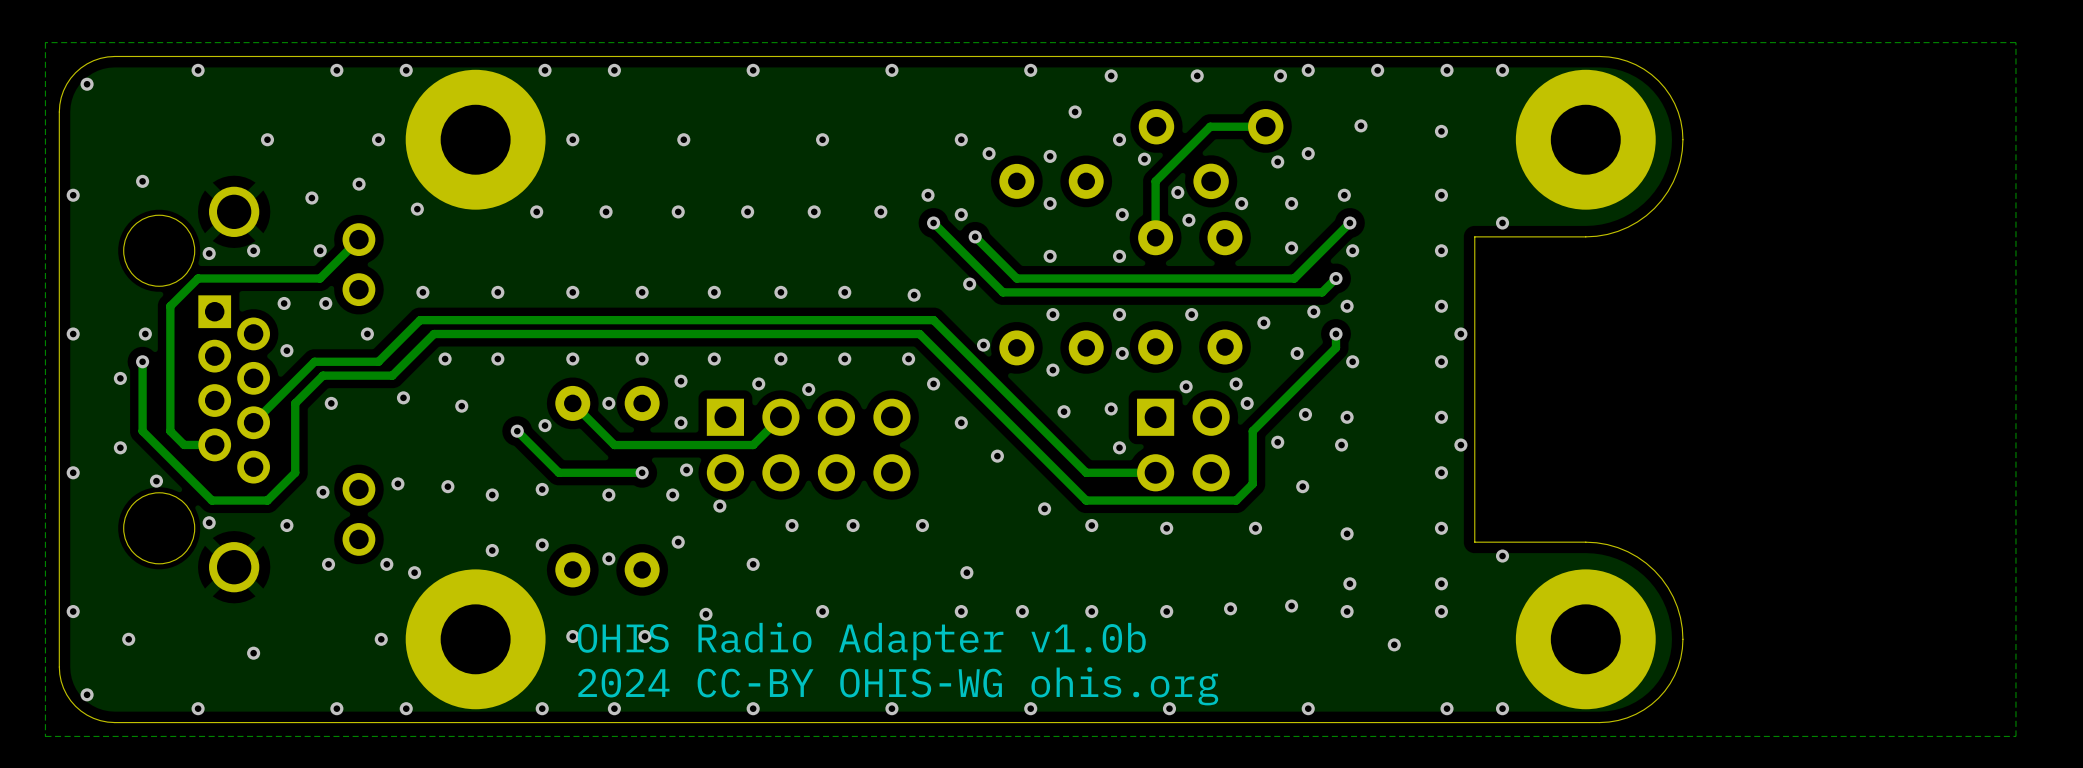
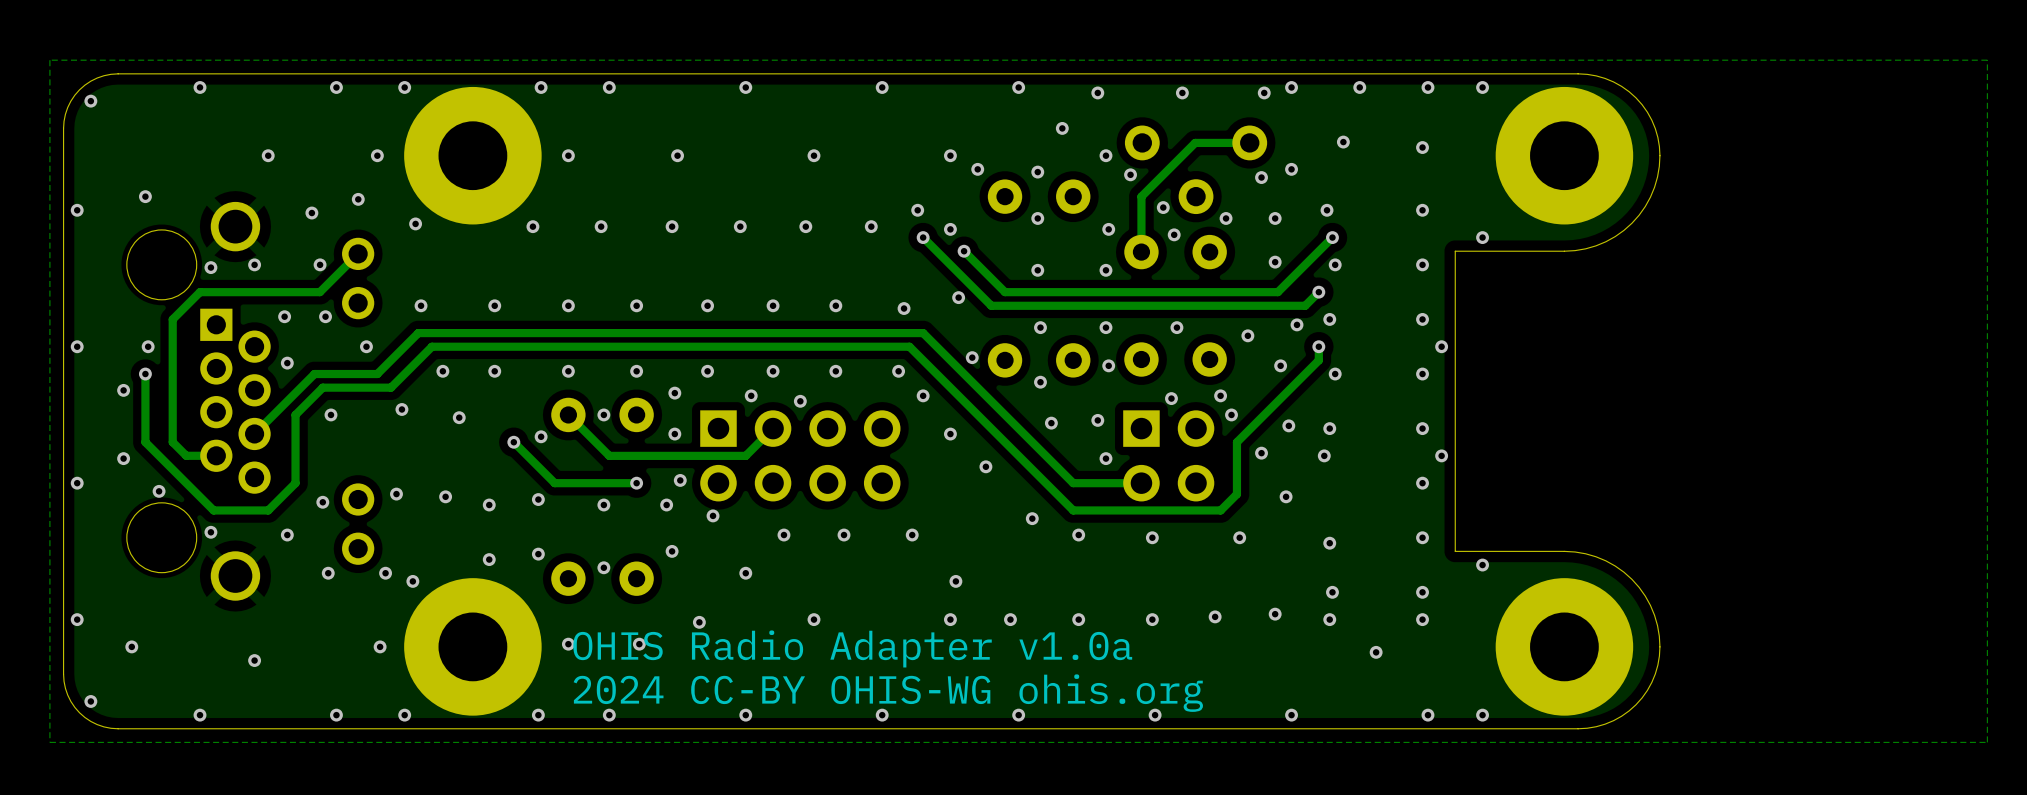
text: OHIS Radio Adapter v1.0b (861, 641) -> OHIS Radio Adapter v1.0a (852, 648)

